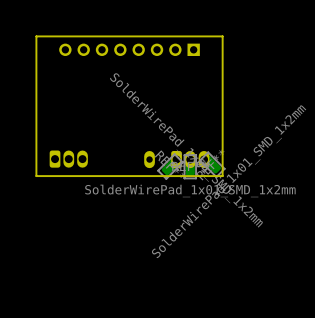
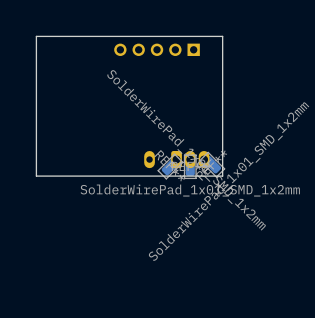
part: (129, 49) -> none
part: (68, 159) -> none

